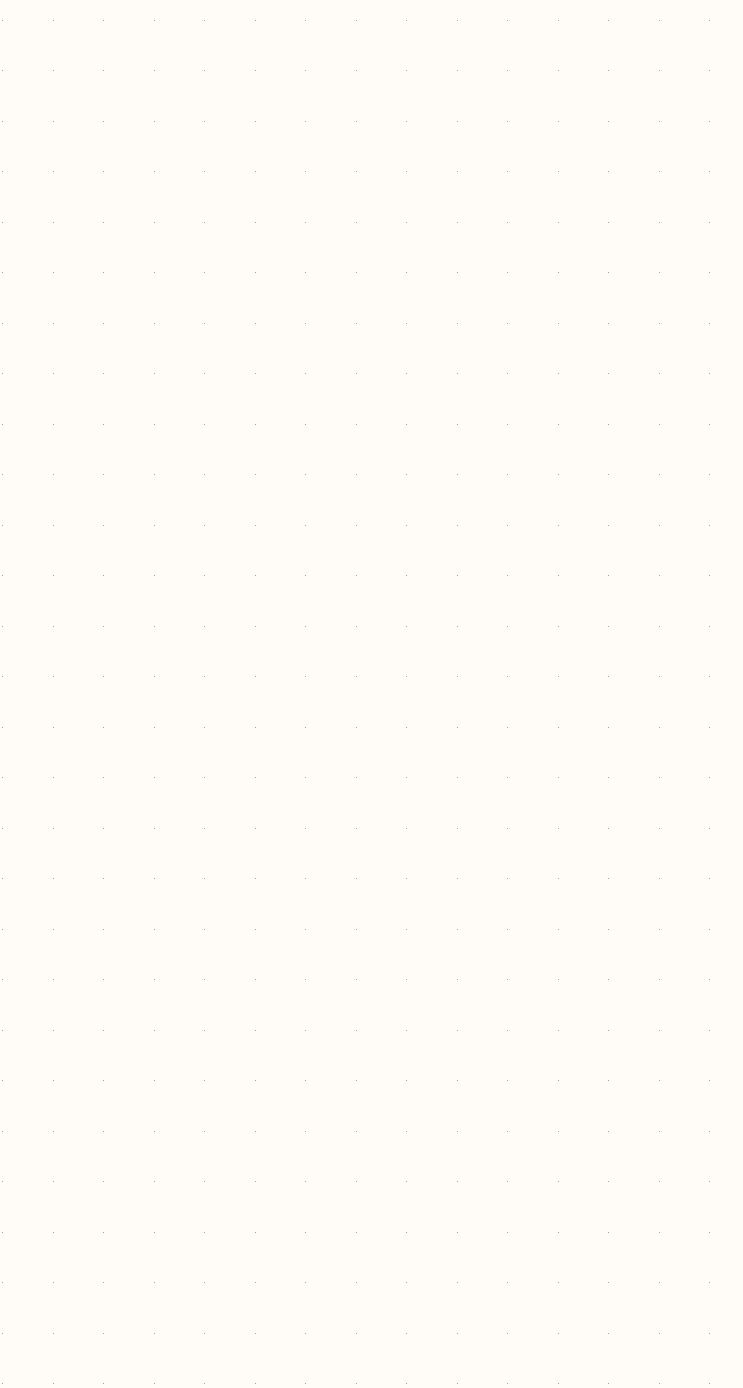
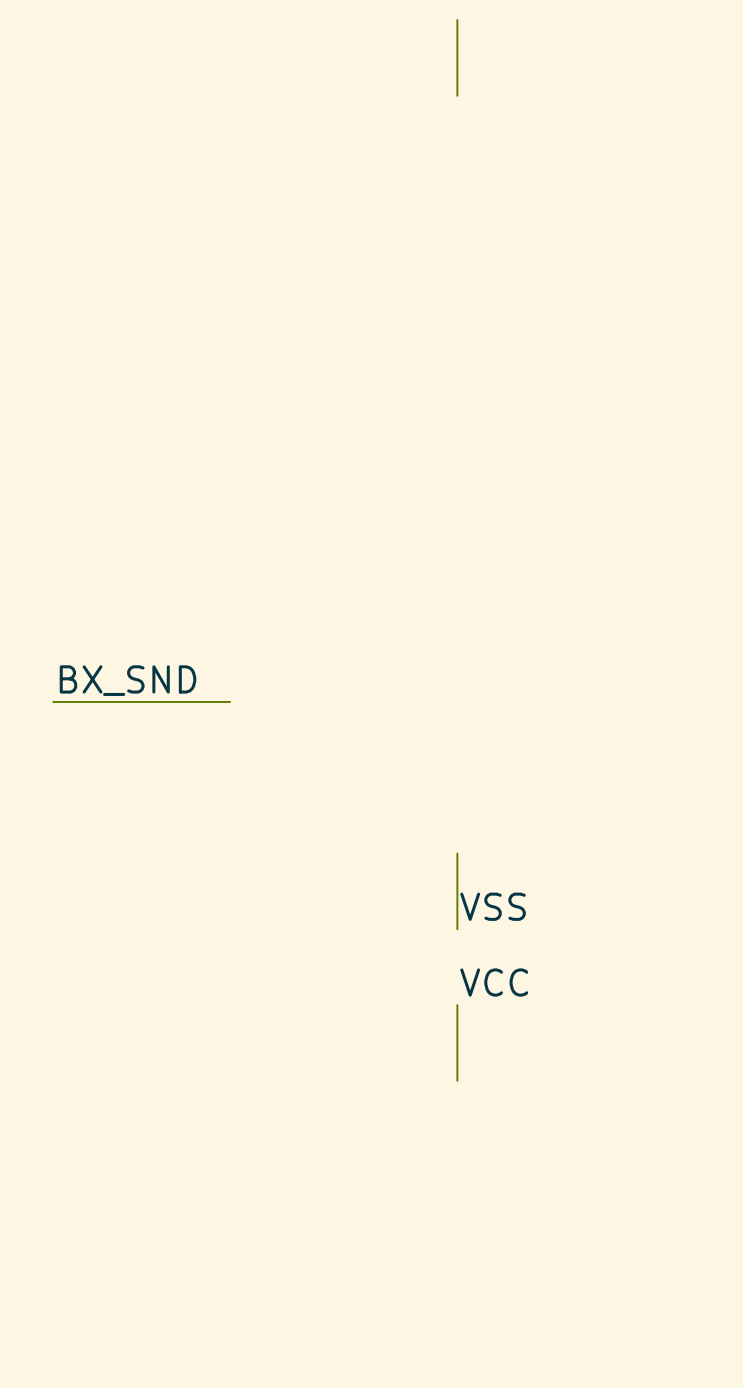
wire: none -> (457, 20) (457, 95)
label: none -> BX_SND (128, 680)
wire: none -> (53, 701) (230, 701)
wire: none -> (457, 853) (457, 929)
label: none -> VSS (493, 906)
label: none -> VCC (494, 982)
wire: none -> (457, 1005) (457, 1080)

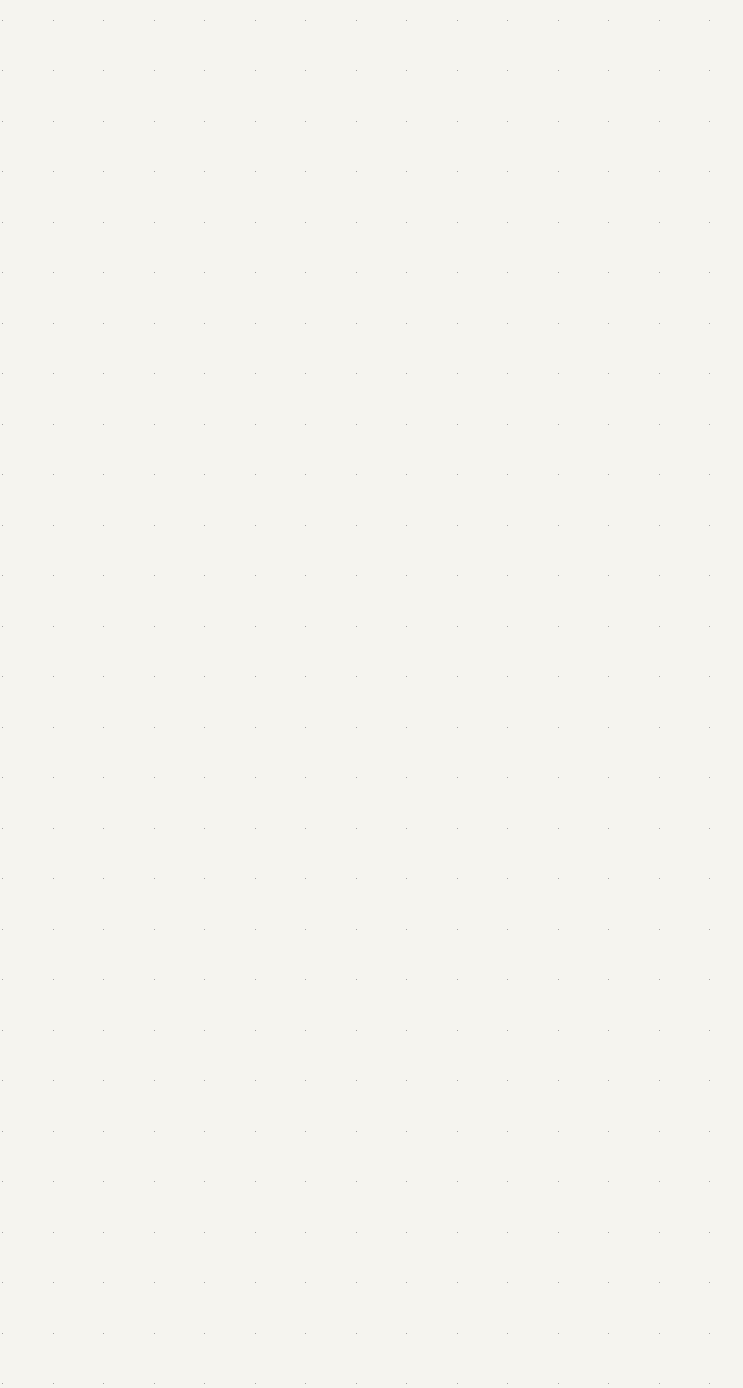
wire: (457, 20) (457, 95) -> none
label: BX_SND (128, 680) -> none
wire: (53, 701) (230, 701) -> none
wire: (457, 853) (457, 929) -> none
label: VSS (493, 906) -> none
label: VCC (494, 982) -> none
wire: (457, 1005) (457, 1080) -> none

